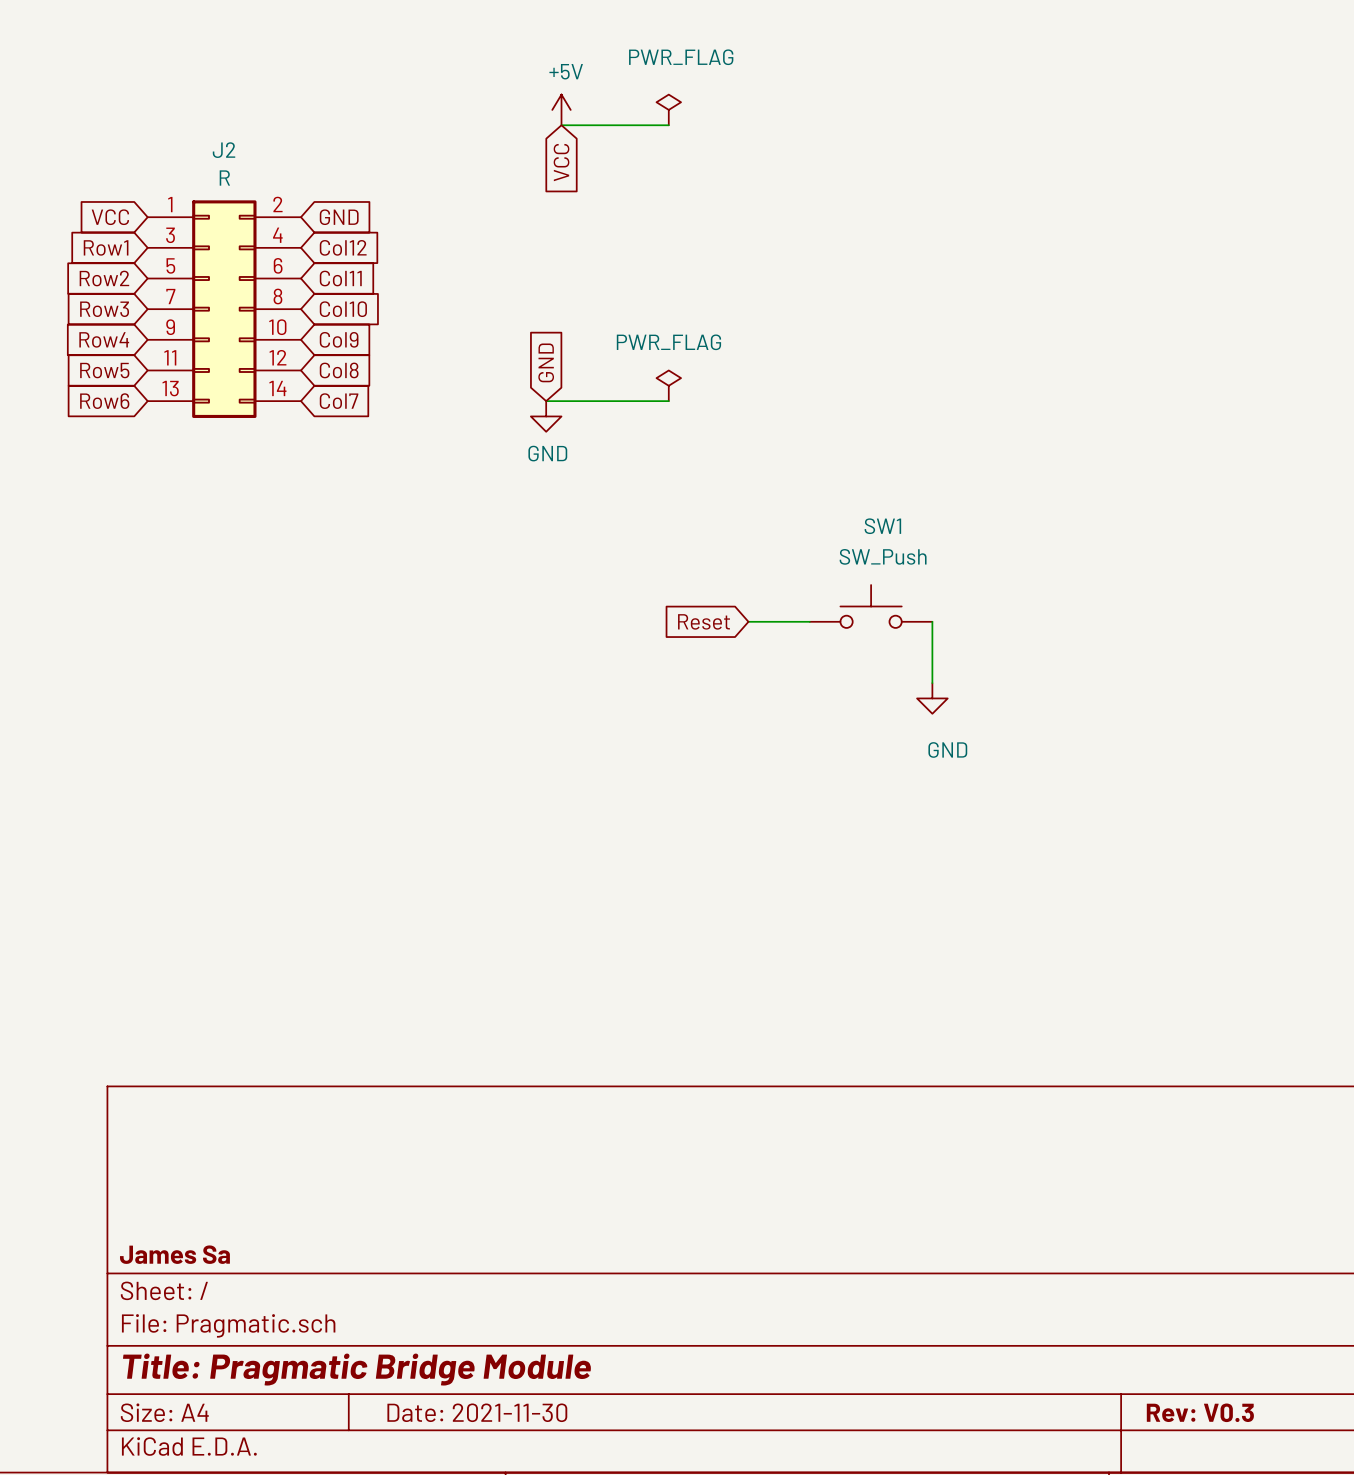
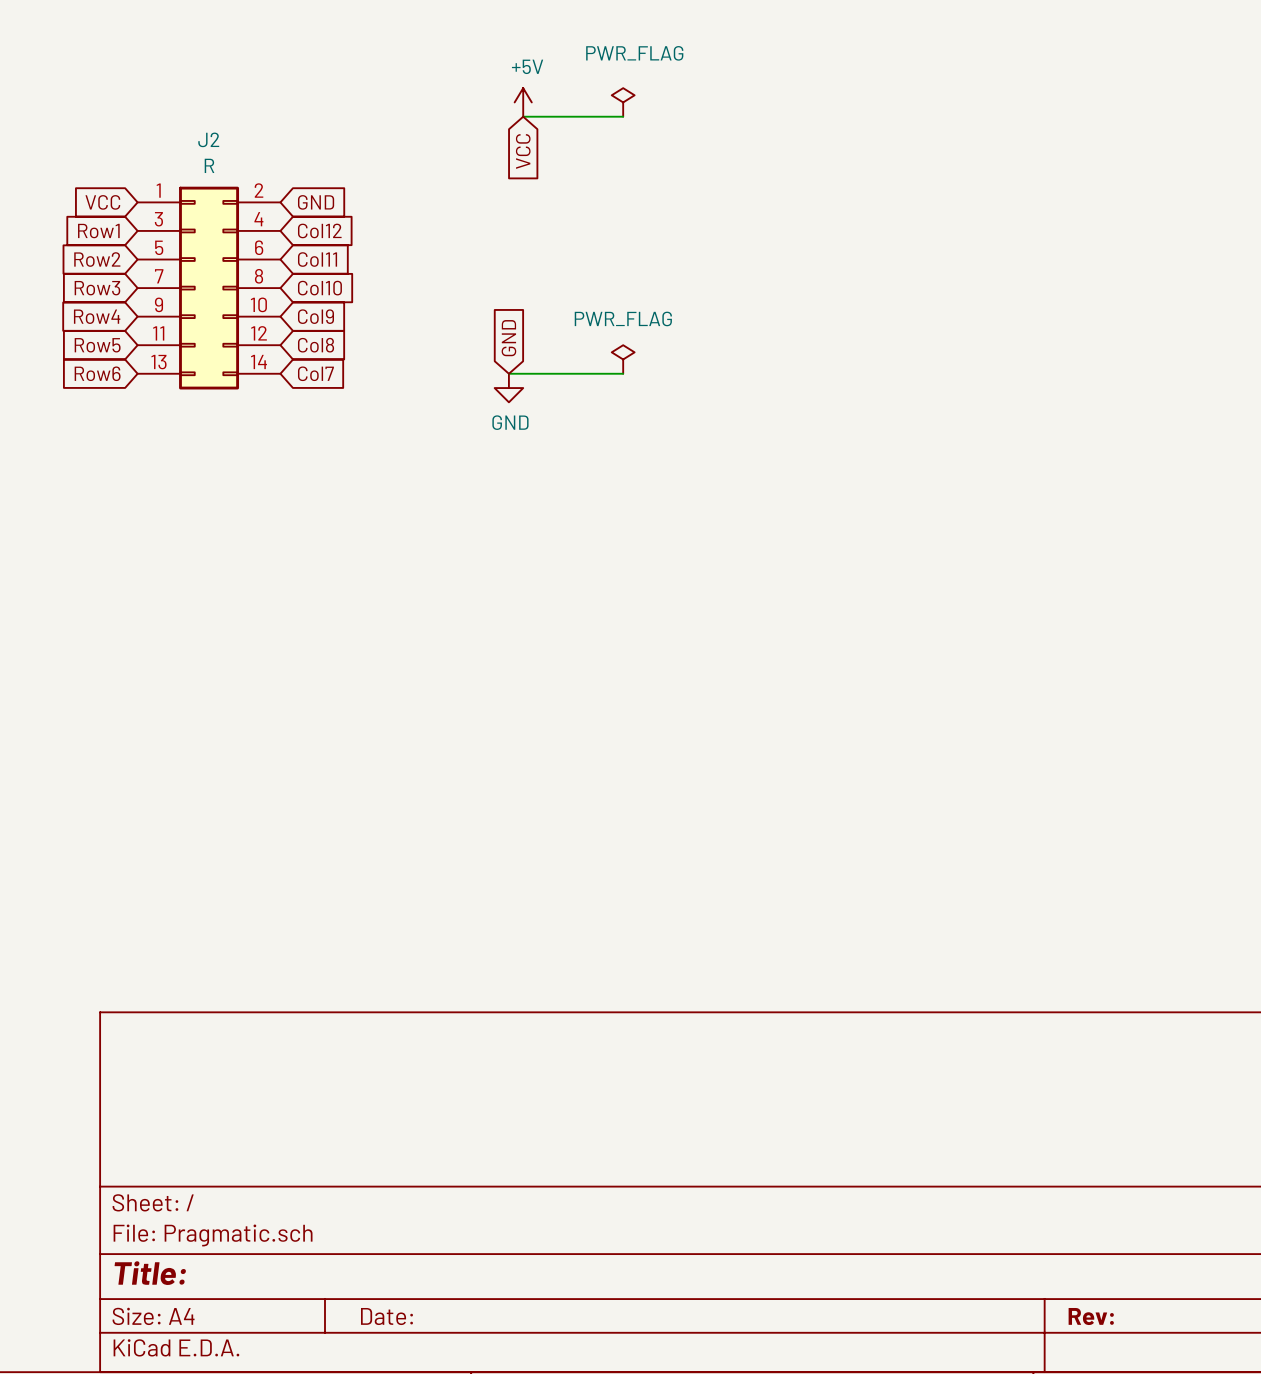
SW1: SW_Push (871, 606) -> none
global label: Reset (704, 621) -> none
wire: (748, 621) (809, 621) -> none
wire: (932, 621) (932, 683) -> none
power symbol: GND (932, 698) -> none
title block: James Sa (174, 1254) -> none
title block: Title: Pragmatic Bridge Module (356, 1369) -> Title: (150, 1273)
title block: Date: 2021-11-30 (477, 1412) -> Date: (386, 1316)
title block: Rev: V0.3 (1200, 1412) -> Rev: (1091, 1316)

